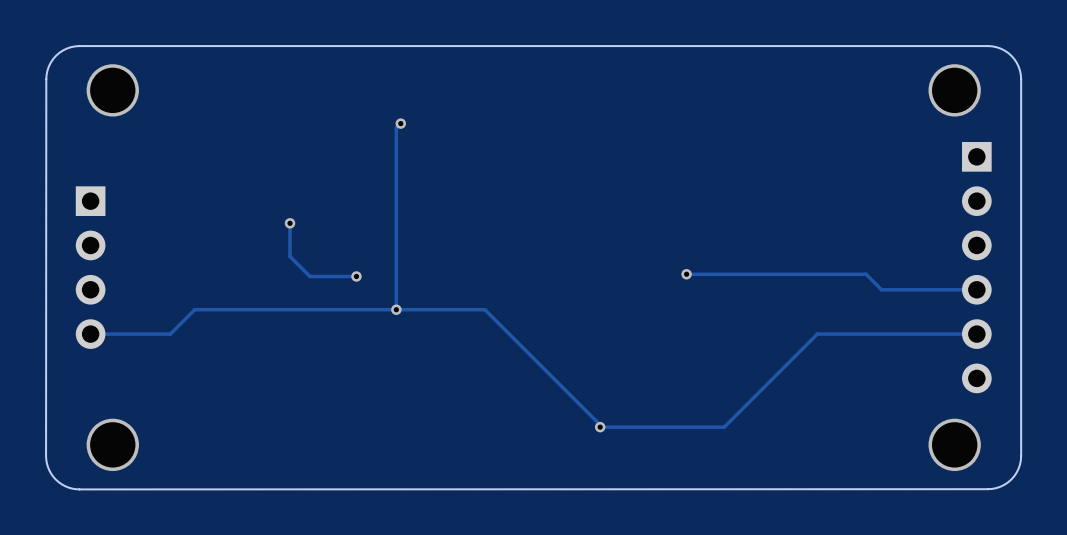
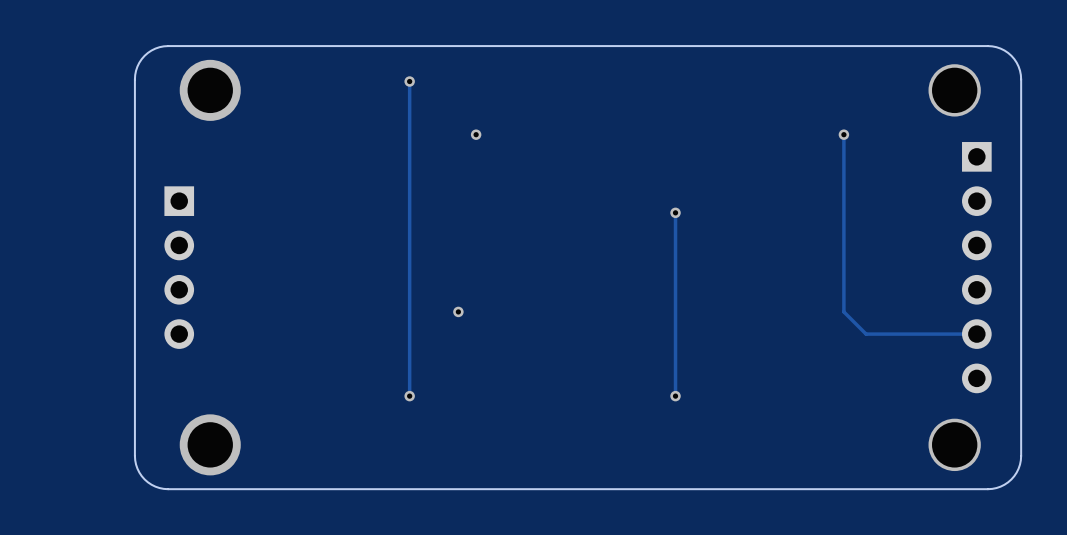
board edge: (168, 46) (70, 47) (56, 55) (47, 70) (46, 455) (51, 473) (65, 486) (79, 489) (987, 489) -> (168, 46) (155, 48) (144, 55) (137, 66) (134, 79) (134, 455) (139, 472) (151, 484) (168, 489) (987, 489)
track: none -> (409, 81) (409, 396)
via: none -> (409, 81)
via: (112, 90) -> none
via: none -> (210, 90)
track: (400, 123) (396, 128) (396, 309) -> none
via: (400, 123) -> none
via: none -> (476, 134)
via: none -> (843, 134)
track: none -> (675, 212) (675, 396)
via: none -> (675, 212)
track: (290, 223) (290, 256) (309, 276) (356, 276) -> none
via: (290, 223) -> none
part position: (90, 267) -> (179, 267)
track: (686, 274) (866, 274) (881, 289) (976, 289) -> none
via: (686, 274) -> none
via: (356, 276) -> none
via: (396, 309) -> none
via: none -> (458, 311)
track: (90, 334) (170, 334) (194, 309) (484, 309) (602, 427) -> none
track: (866, 334) (817, 334) (724, 427) (600, 427) -> (866, 334) (843, 311) (843, 134)
via: none -> (409, 396)
via: none -> (675, 396)
via: (600, 427) -> none
via: (112, 444) -> none
via: none -> (210, 444)

